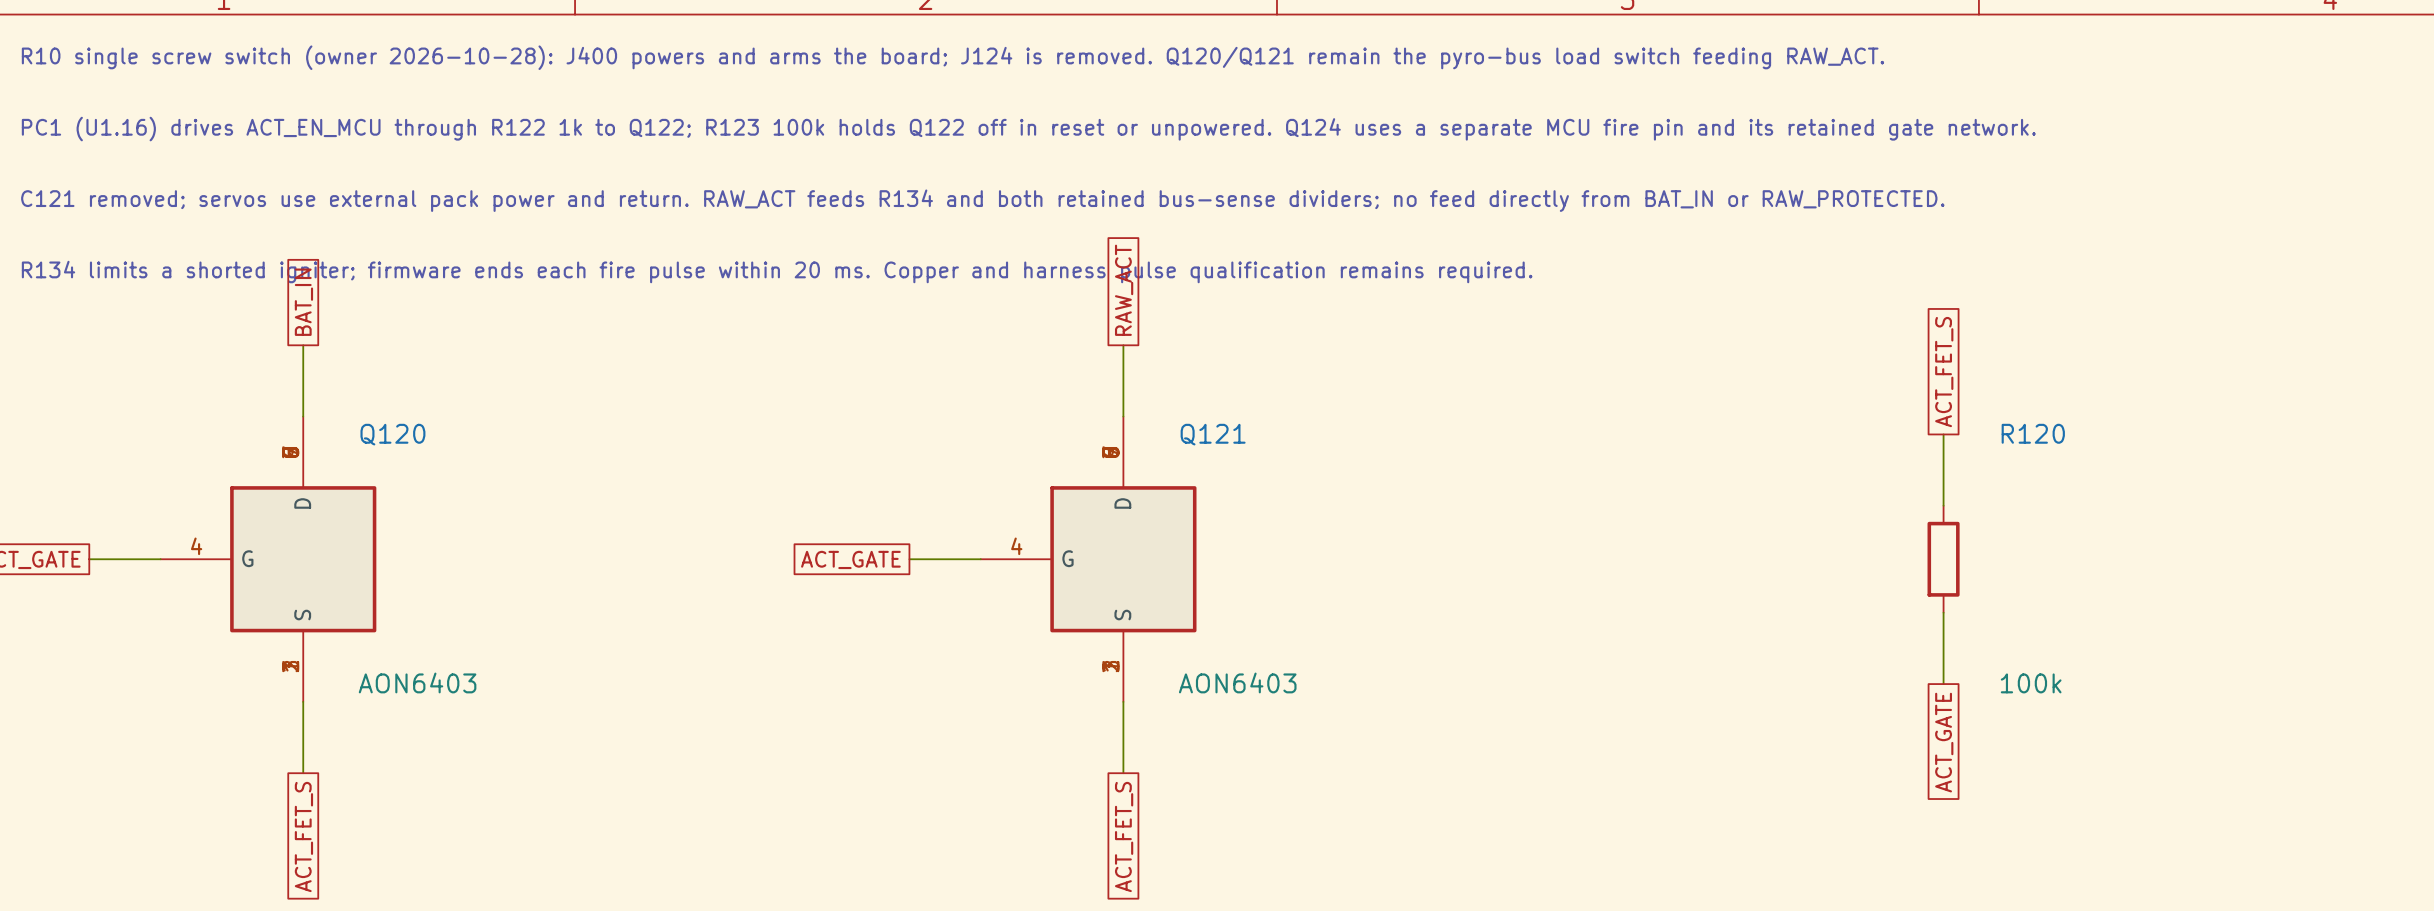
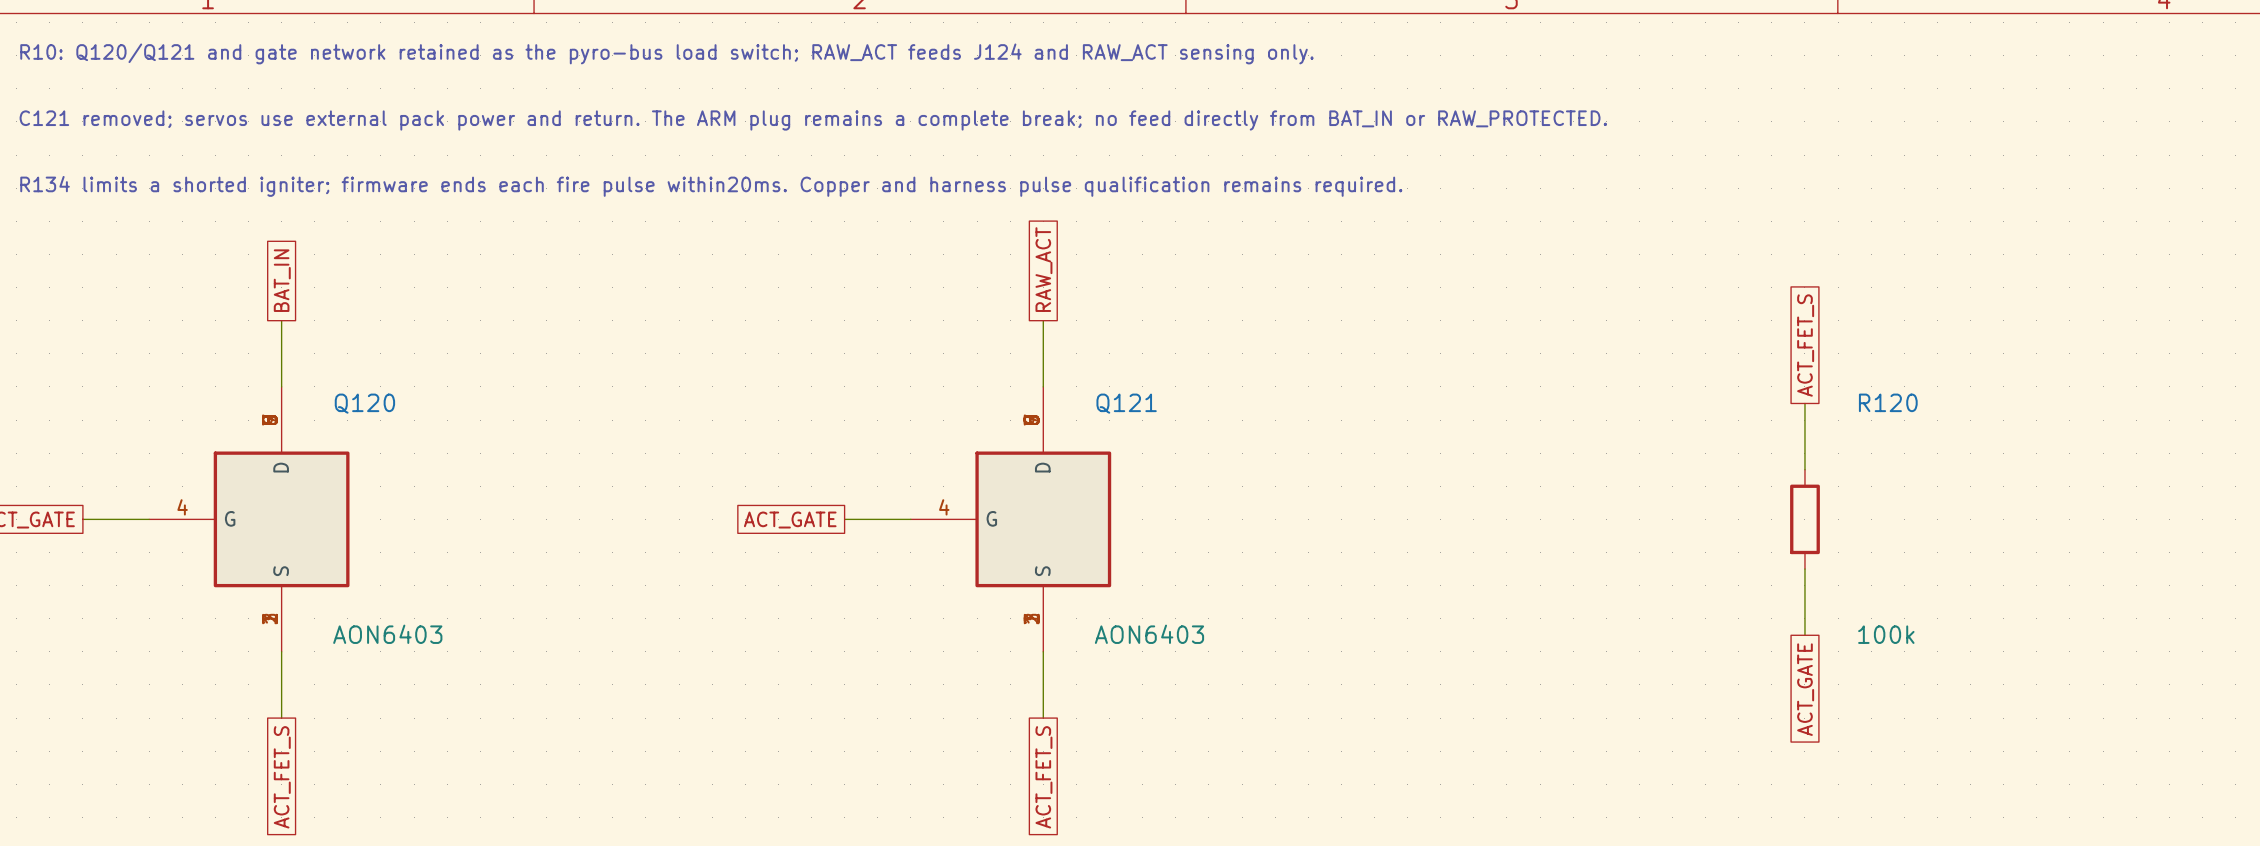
text: R10 single screw switch (owner 2026-10-28): J400 powers and arms the board; J124 is removed. Q120/Q121 remain the pyro-bus load switch feeding RAW_ACT. (952, 57) -> R10: Q120/Q121 and gate network retained as the pyro-bus load switch; RAW_ACT feeds J124 and RAW_ACT sensing only. (666, 53)
text: PC1 (U1.16) drives ACT_EN_MCU through R122 1k to Q122; R123 100k holds Q122 off in reset or unpowered. Q124 uses a separate MCU fire pin and its retained gate network. (1028, 129) -> C121 removed; servos use external pack power and return. The ARM plug remains a complete break; no feed directly from BAT_IN or RAW_PROTECTED. (813, 120)
text: C121 removed; servos use external pack power and return. RAW_ACT feeds R134 and both retained bus-sense dividers; no feed directly from BAT_IN or RAW_PROTECTED. (982, 200) -> R134 limits a shorted igniter; firmware ends each fire pulse within20ms. Copper and harness pulse qualification remains required. (711, 186)
text: R134 limits a shorted igniter; firmware ends each fire pulse within 20 ms. Copper and harness pulse qualification remains required. (777, 272) -> none

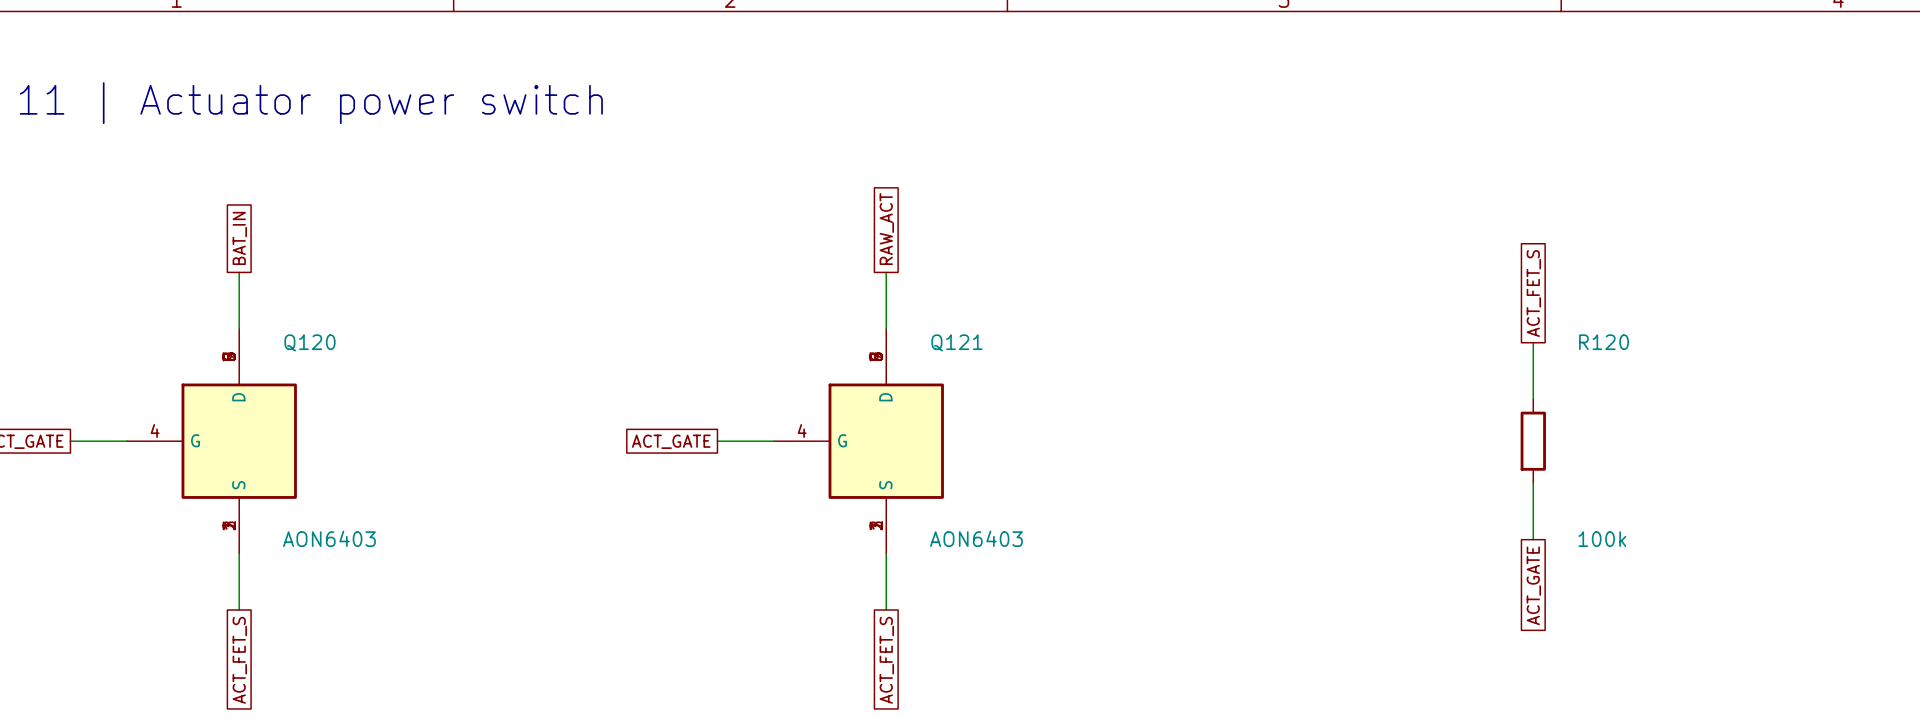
text: R10: Q120/Q121 and gate network retained as the pyro-bus load switch; RAW_ACT feeds J124 and RAW_ACT sensing only. (666, 53) -> none
text: C121 removed; servos use external pack power and return. The ARM plug remains a complete break; no feed directly from BAT_IN or RAW_PROTECTED. (813, 120) -> 11 | Actuator power switch (311, 103)
text: R134 limits a shorted igniter; firmware ends each fire pulse within20ms. Copper and harness pulse qualification remains required. (711, 186) -> none

